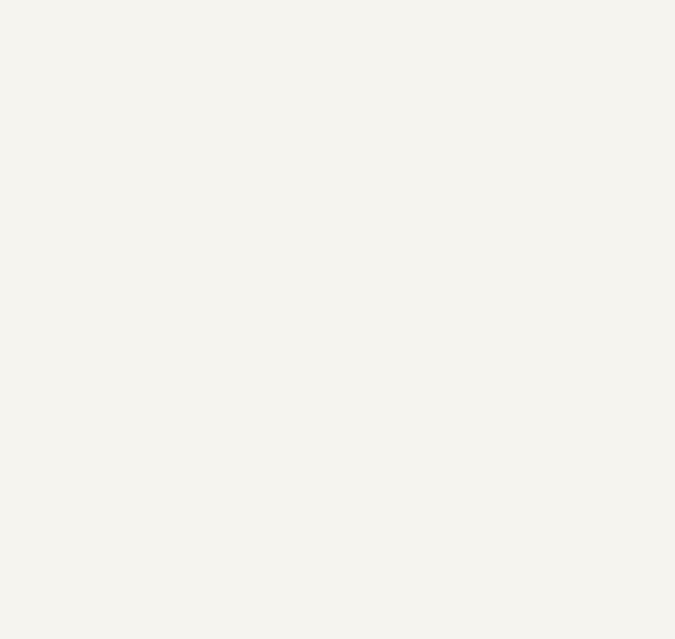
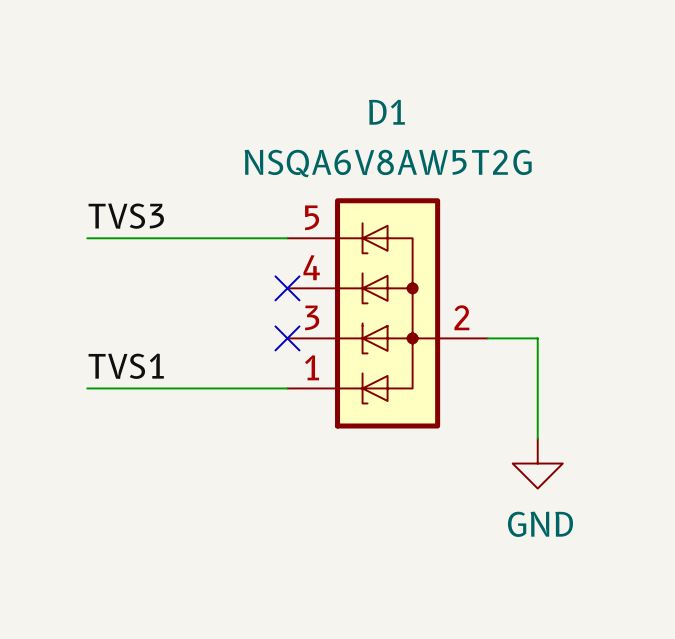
label: none -> TVS3 (126, 216)
wire: none -> (87, 238) (287, 238)
no-connect mark: none -> (287, 288)
D1: none -> NSQA6V8AW5T2G (387, 313)
no-connect mark: none -> (287, 338)
wire: none -> (487, 338) (537, 338) (537, 438)
label: none -> TVS1 (126, 366)
wire: none -> (87, 388) (287, 388)
power symbol: none -> GND (537, 463)

